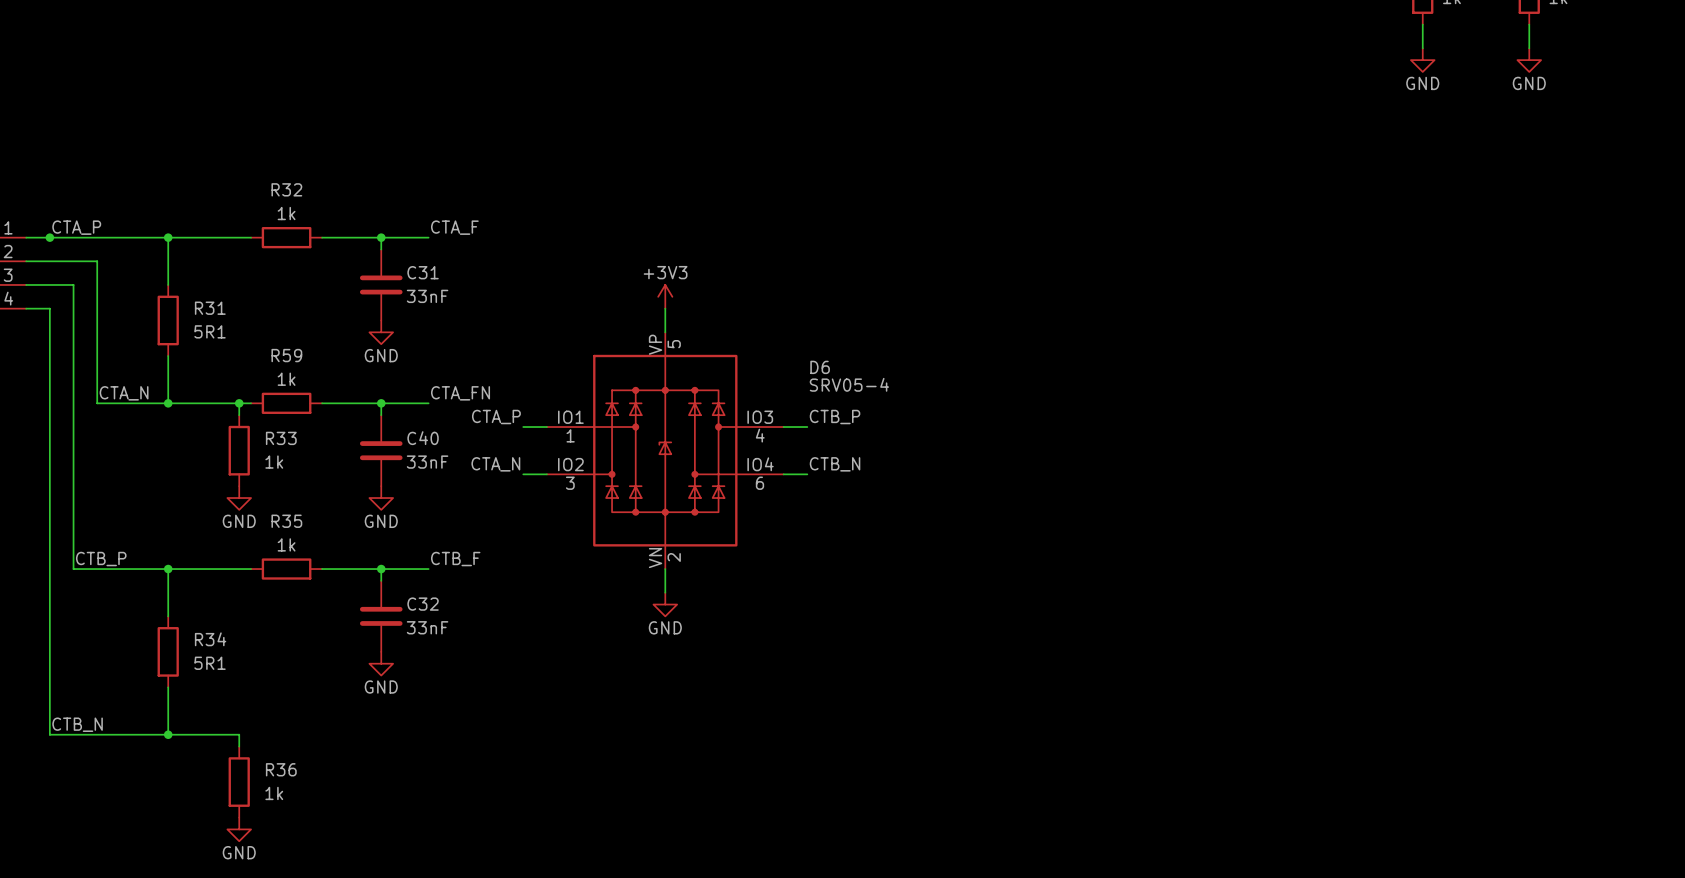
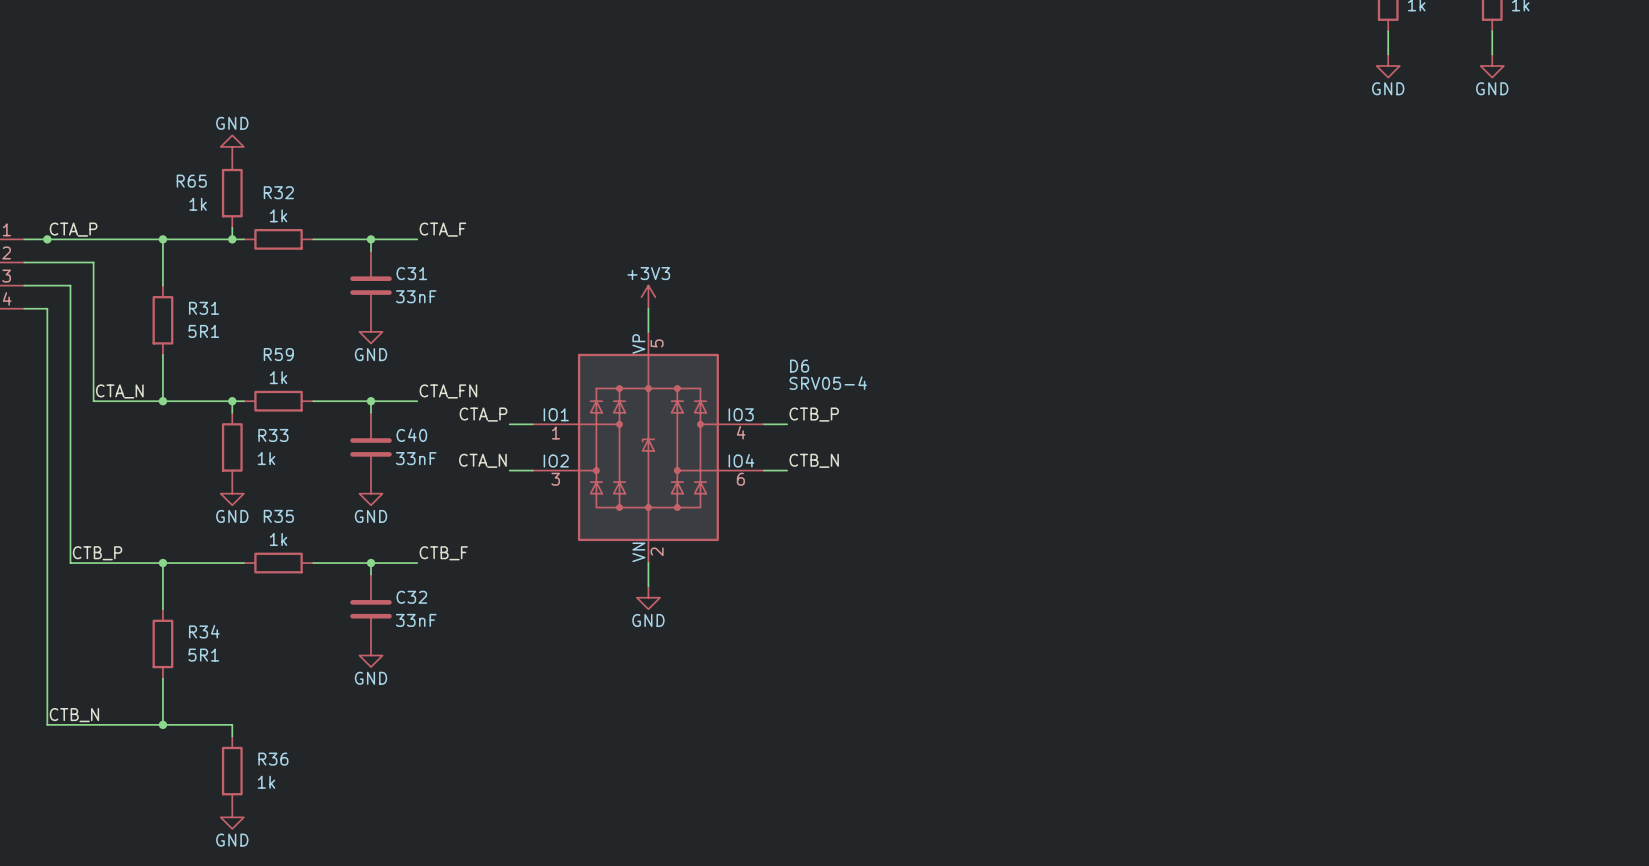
power symbol: none -> GND (232, 146)
R65: none -> 1k (232, 193)
wire: none -> (232, 227) (232, 239)
junction: none -> (232, 239)

